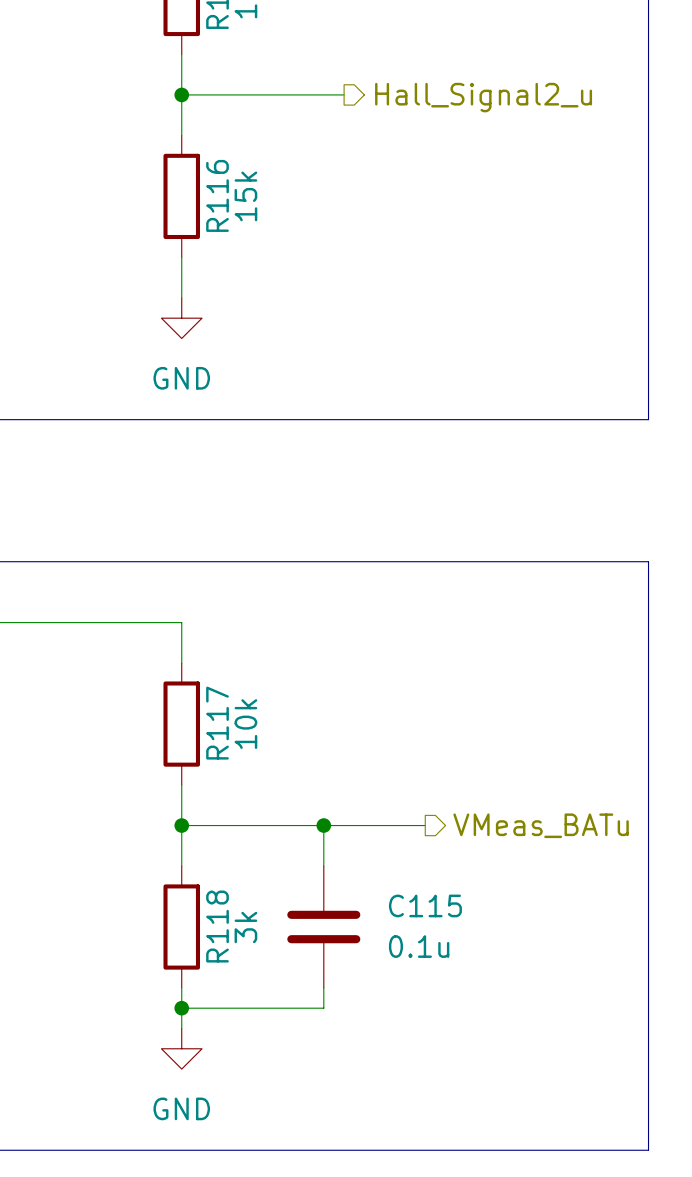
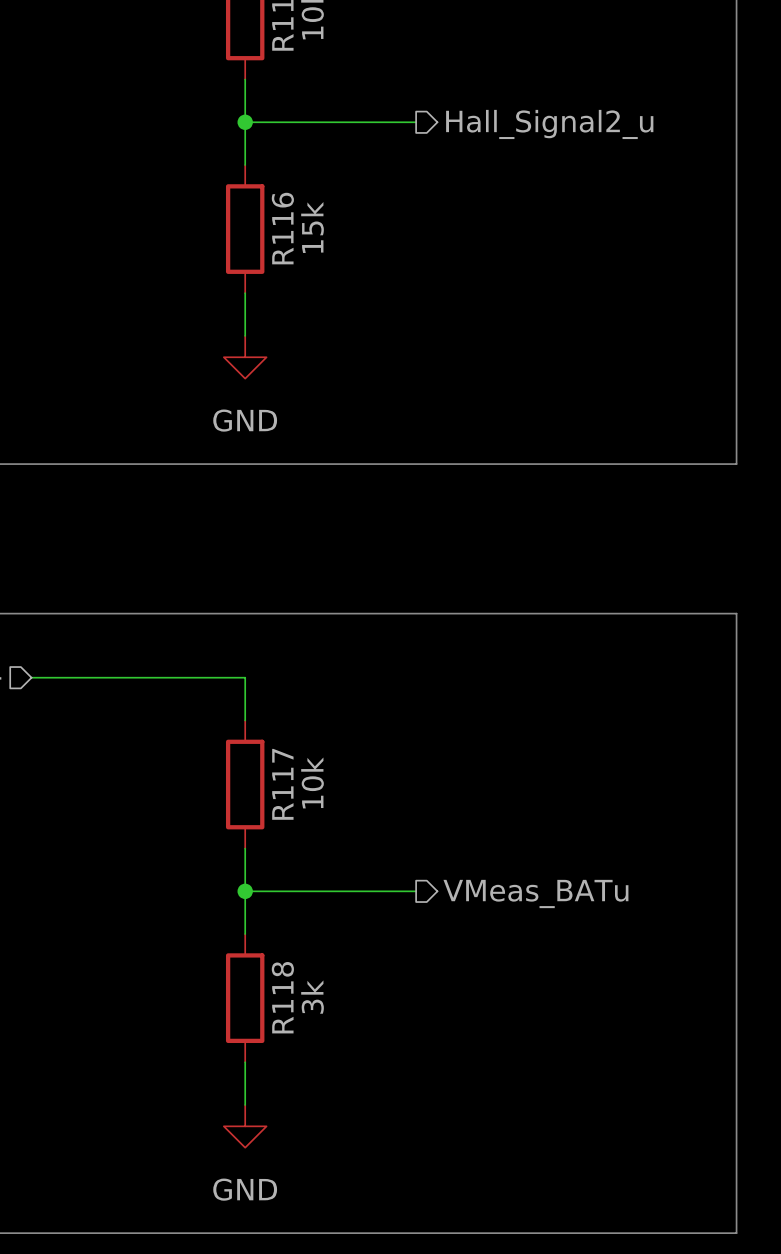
wire: (323, 825) (323, 866) -> none
junction: (323, 825) -> none
wire: (344, 825) (425, 825) -> none
hierarchical label position: VMeas_BATu (541, 825) -> VMeas_BATu (535, 893)
C115: 0.1u (323, 927) -> none
wire: (323, 987) (323, 1008) (181, 1008) -> none
junction: (181, 1008) -> none

